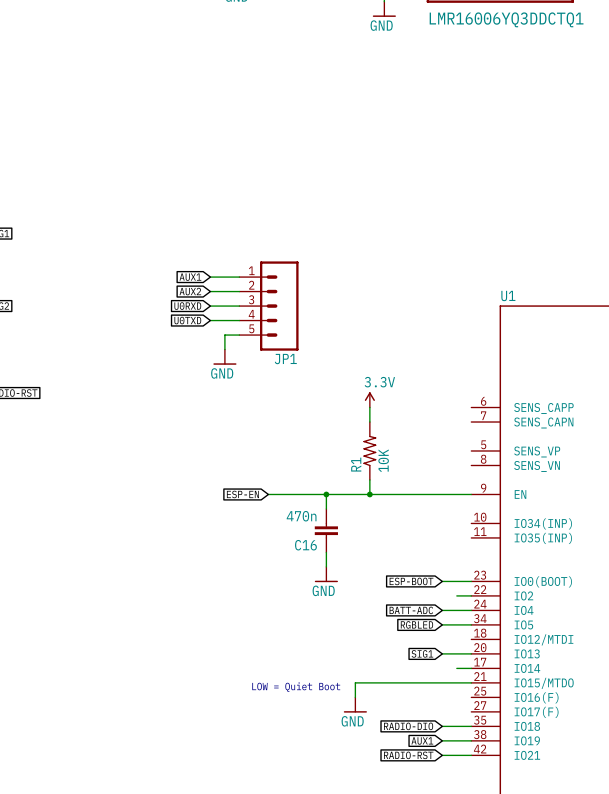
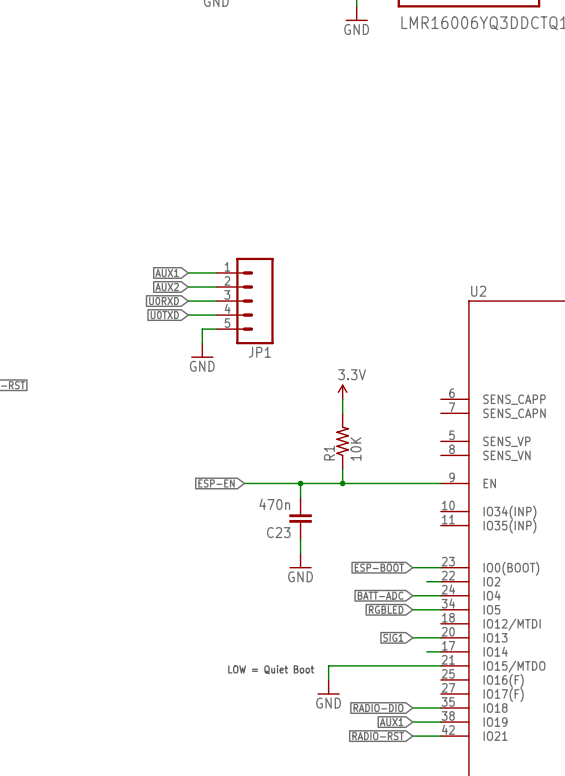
U1 name: U1 (508, 295) -> U2 (478, 291)
C16 name: C16 (305, 545) -> C23 (278, 532)

